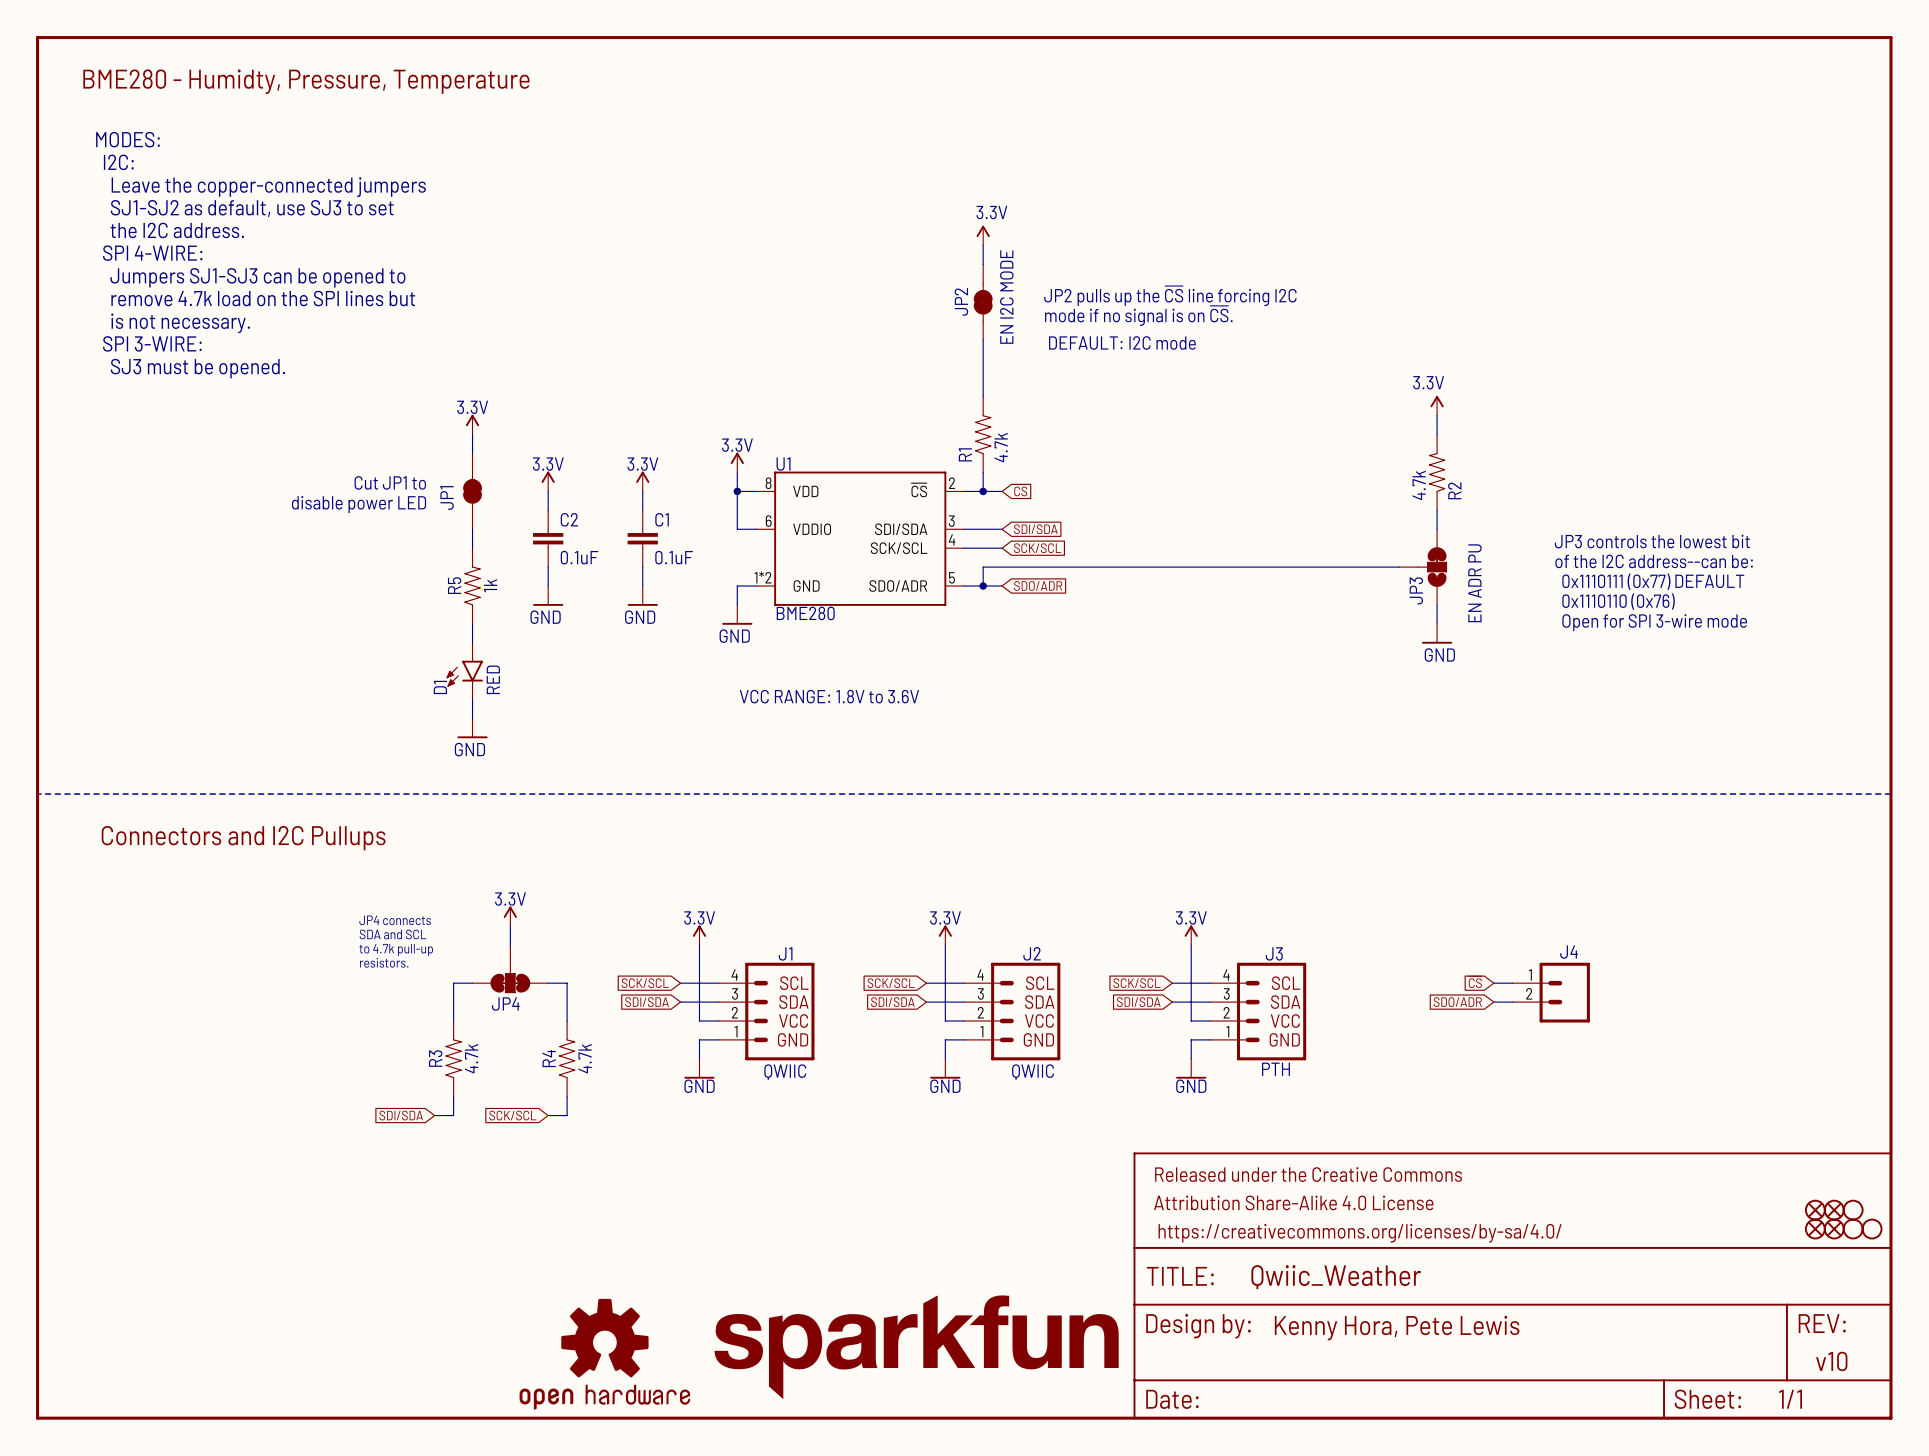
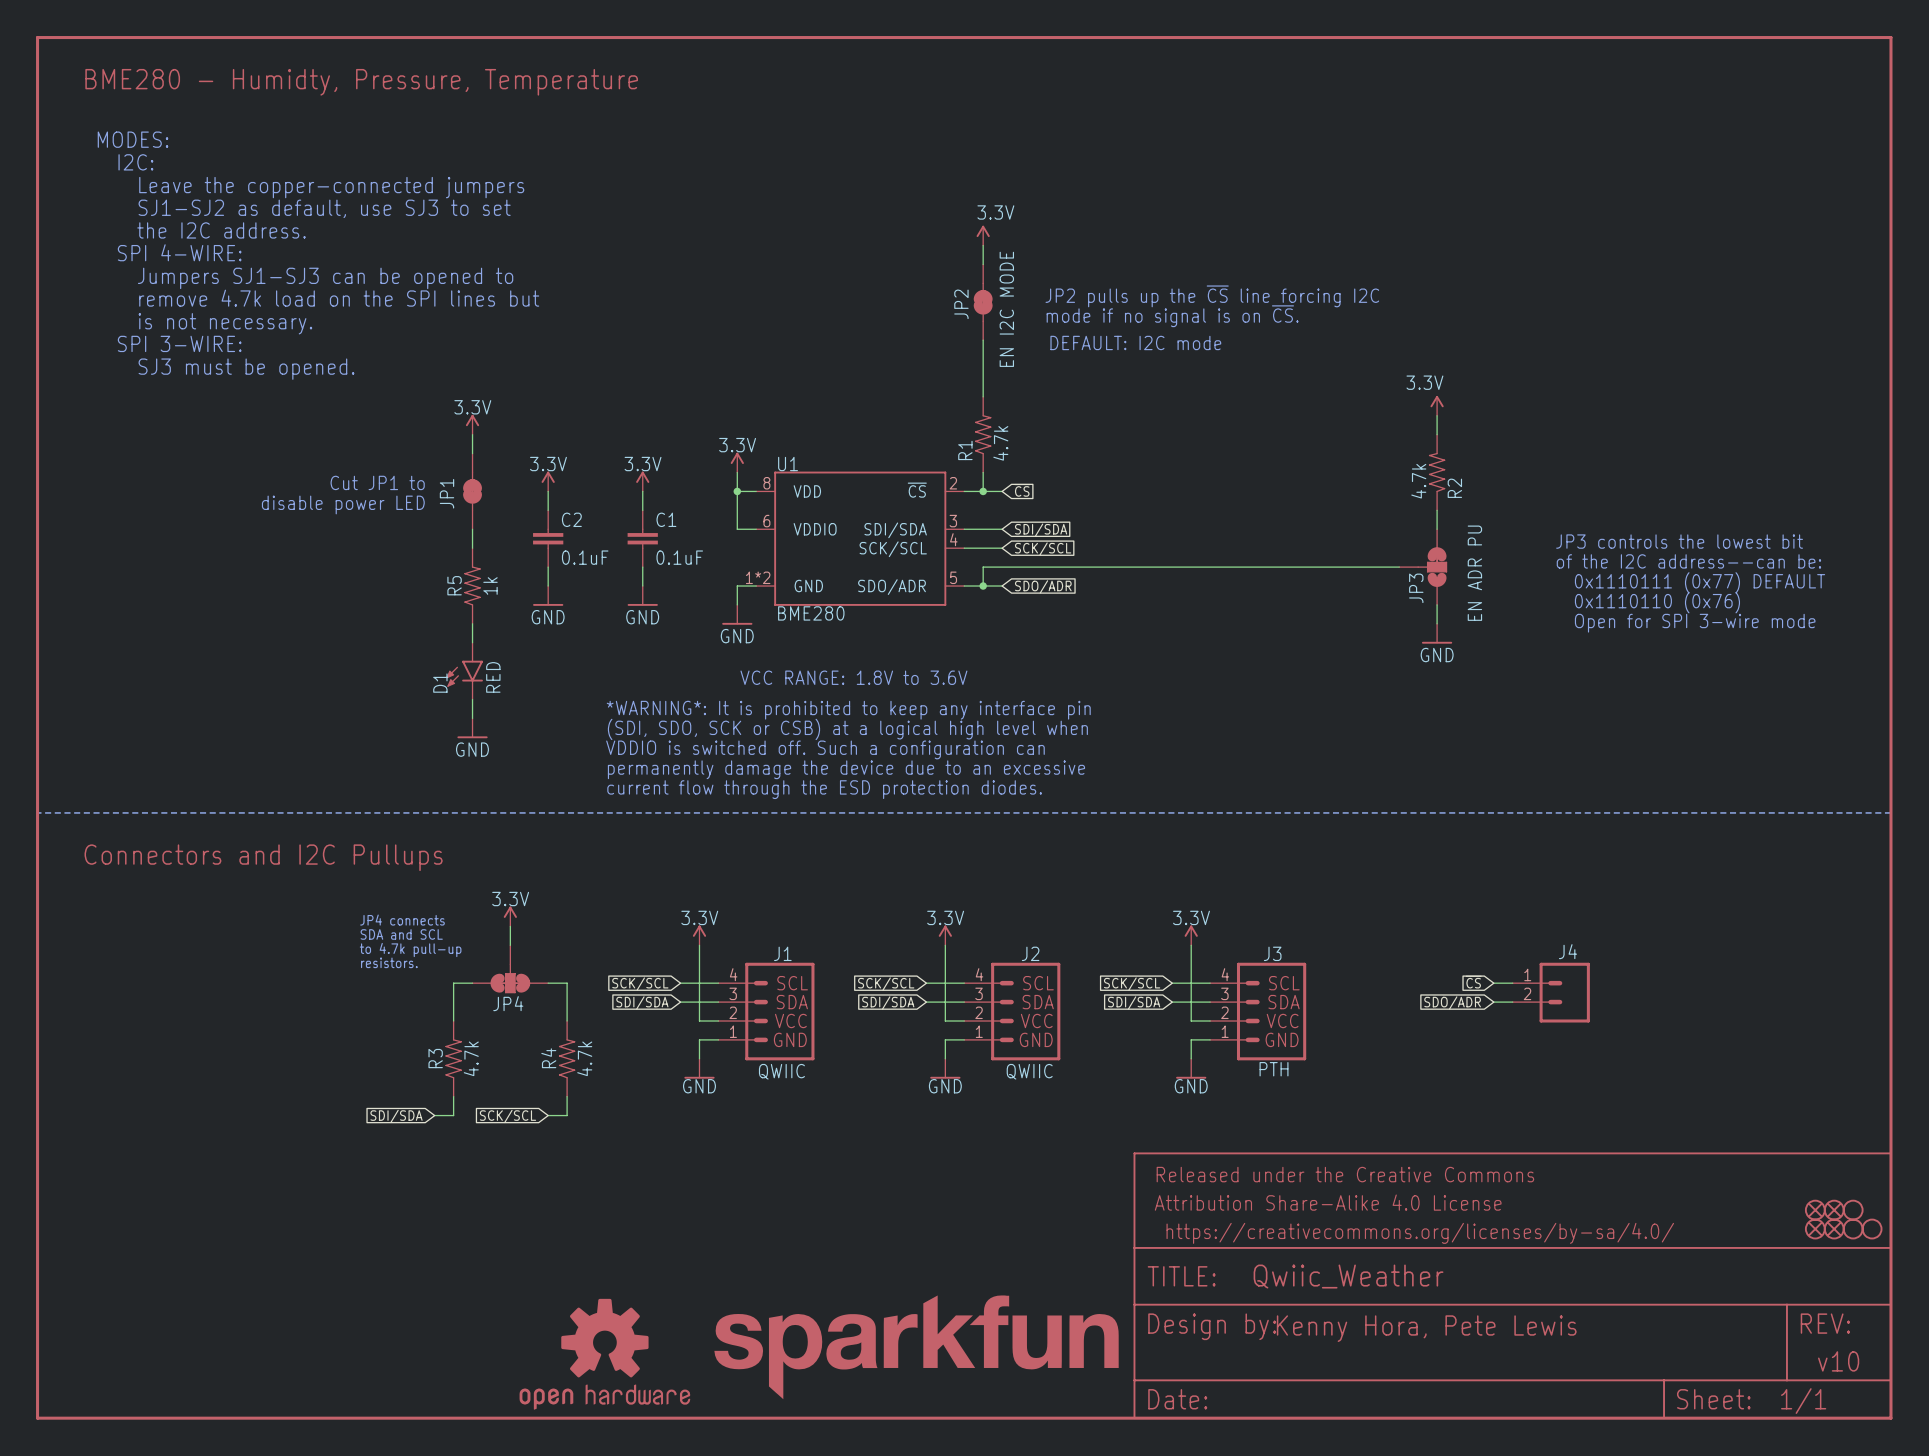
text position: VCC RANGE: 1.8V to 3.6V (829, 696) -> VCC RANGE: 1.8V to 3.6V (853, 677)
text: none -> *WARNING*: It is prohibited to keep any interface pin (848, 710)
text: none -> (SDI, SDO, SCK or CSB) at a logical high level when (847, 729)
text: none -> VDDIO is switched off. Such a configuration can (825, 749)
text: none -> permanently damage the device due to an excessive (846, 769)
text: none -> current flow through the ESD protection diodes. (824, 789)
line: (37, 794) (1890, 794) -> (37, 812) (1890, 812)
text position: Connectors and I2C Pullups (243, 838) -> Connectors and I2C Pullups (263, 857)

